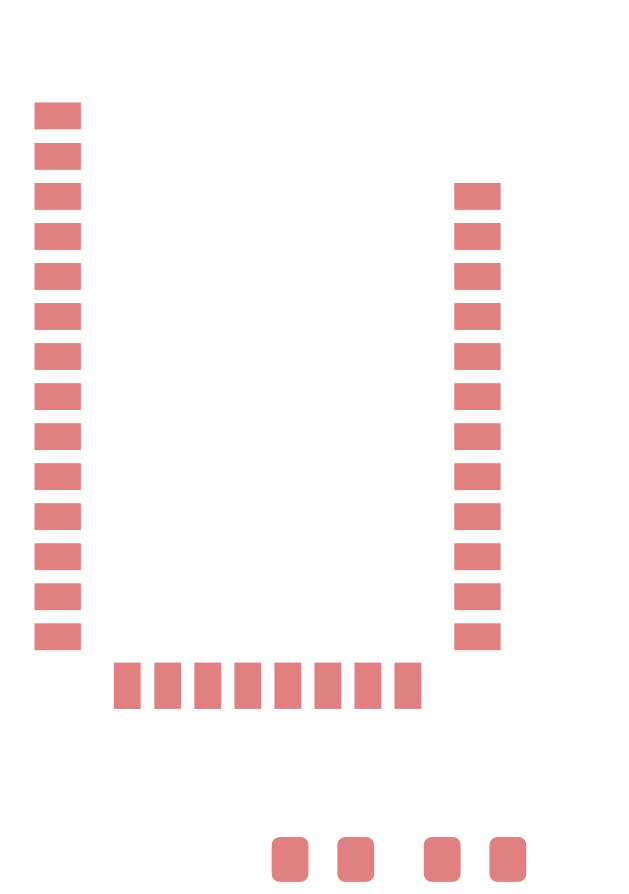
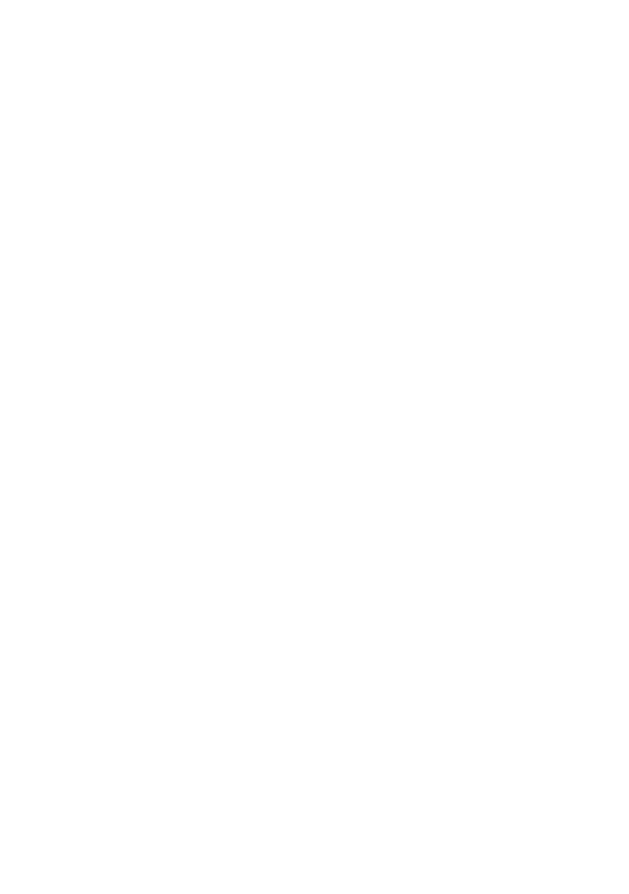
part: (267, 405) -> none
part: (322, 859) -> none
part: (475, 859) -> none

